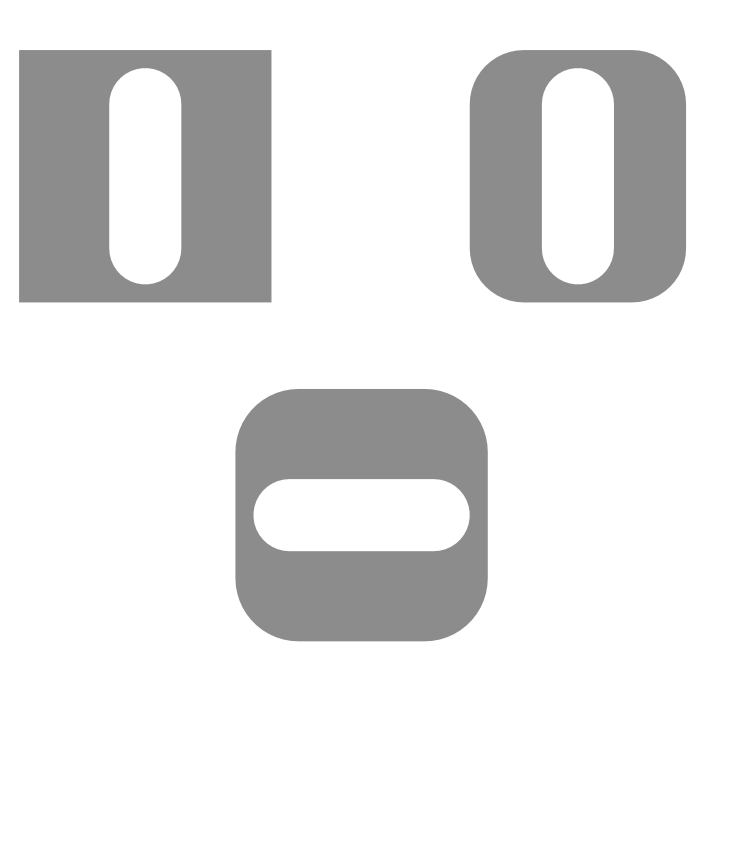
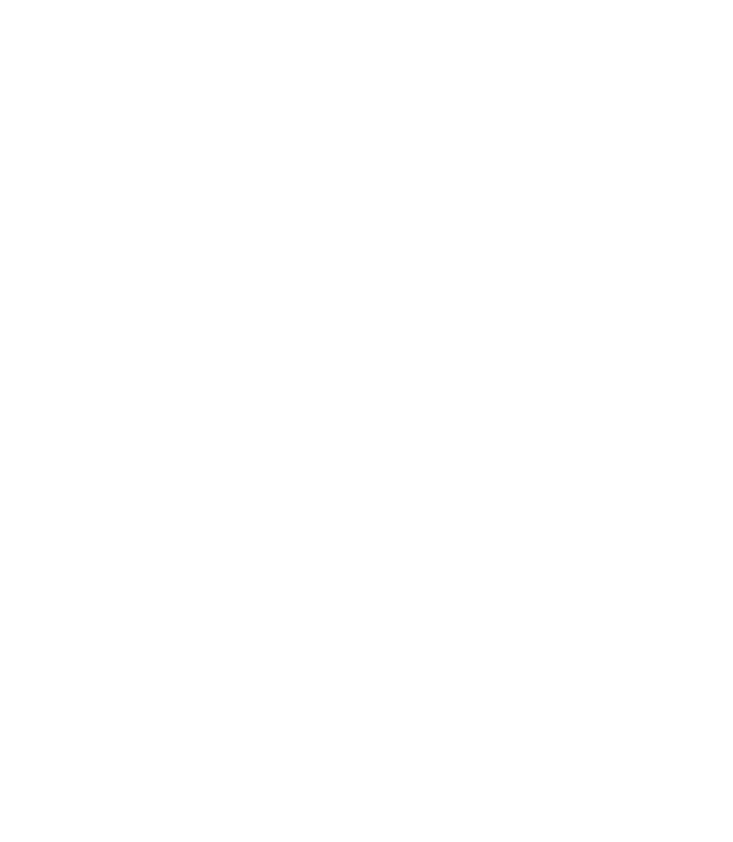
part: (352, 345) -> none

